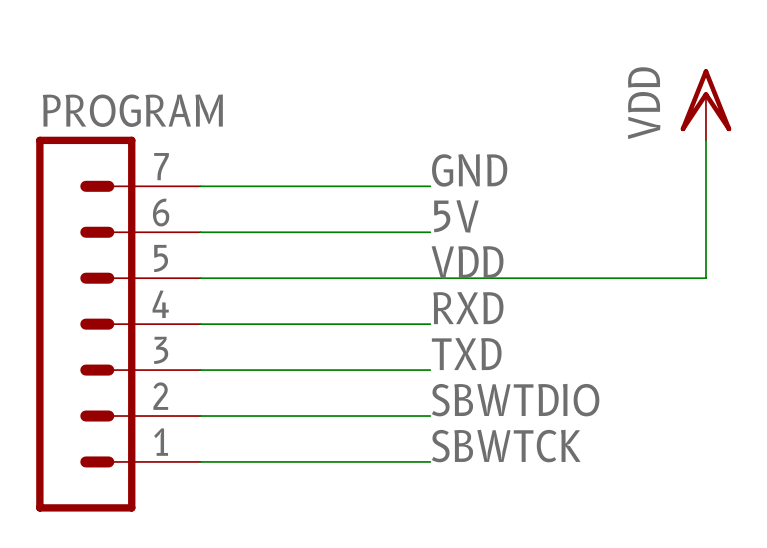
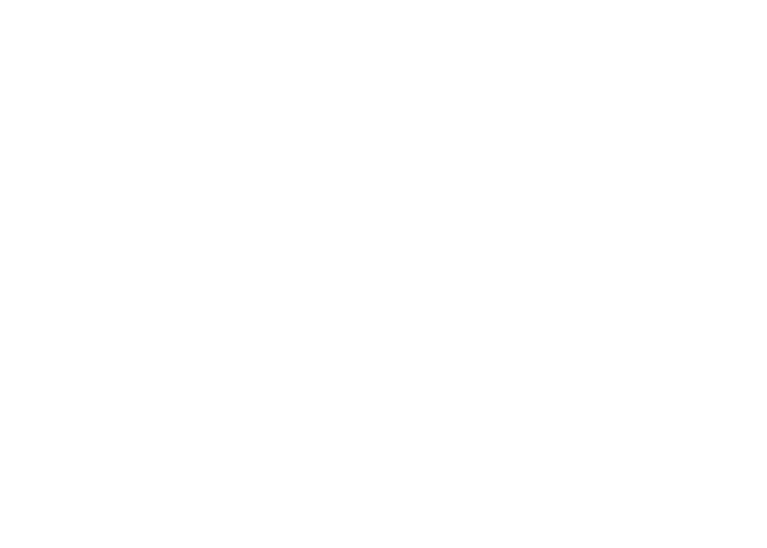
power symbol: VDD (705, 104) -> none
wire: (705, 140) (705, 278) (200, 278) -> none
label: GND (469, 170) -> none
wire: (200, 186) (430, 186) -> none
label: 5V (456, 216) -> none
wire: (200, 232) (430, 232) -> none
label: VDD (467, 262) -> none
label: RXD (468, 308) -> none
PROGRAM: (118, 324) -> none
wire: (200, 324) (430, 324) -> none
label: TXD (466, 354) -> none
wire: (200, 370) (430, 370) -> none
label: SBWTDIO (515, 400) -> none
wire: (200, 416) (430, 416) -> none
label: SBWTCK (506, 446) -> none
wire: (200, 461) (430, 461) -> none

